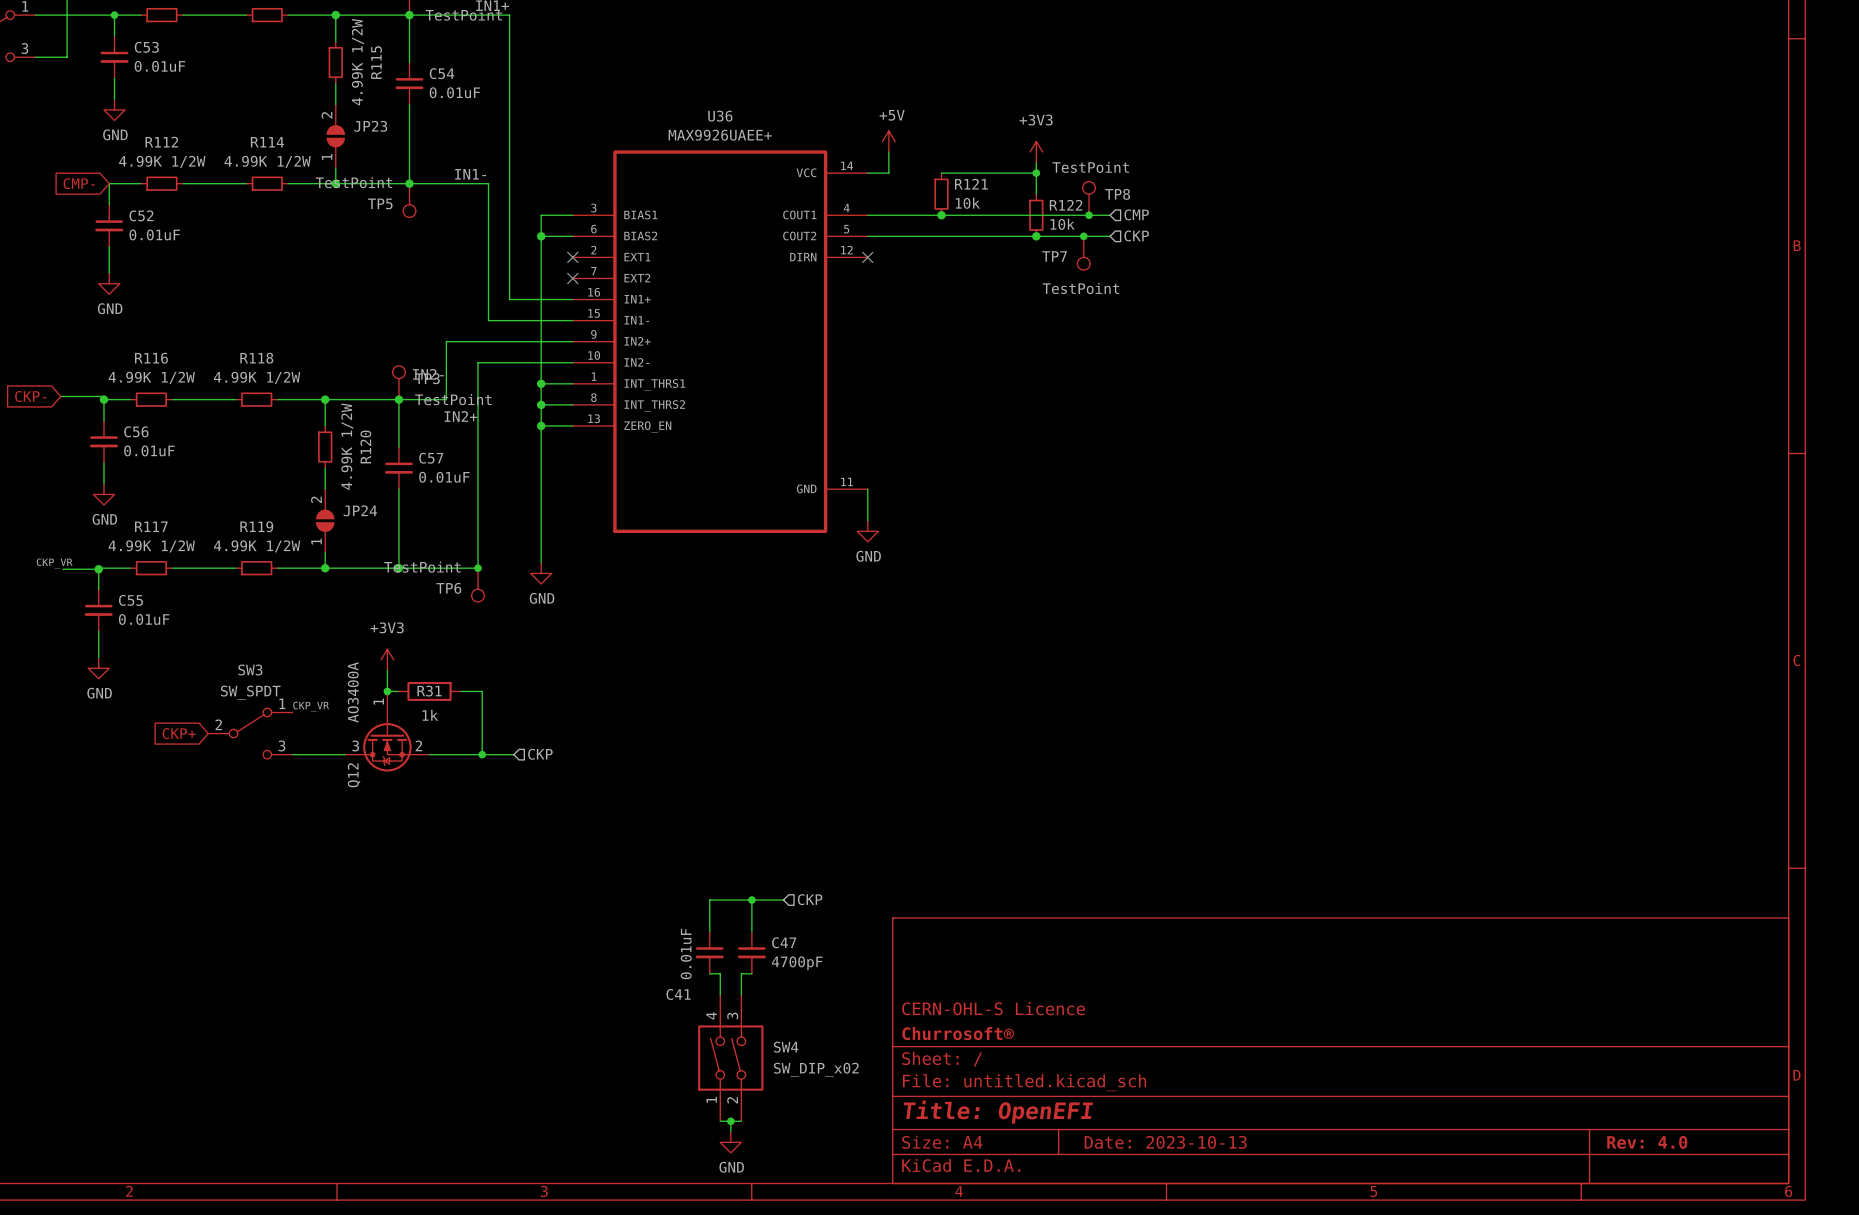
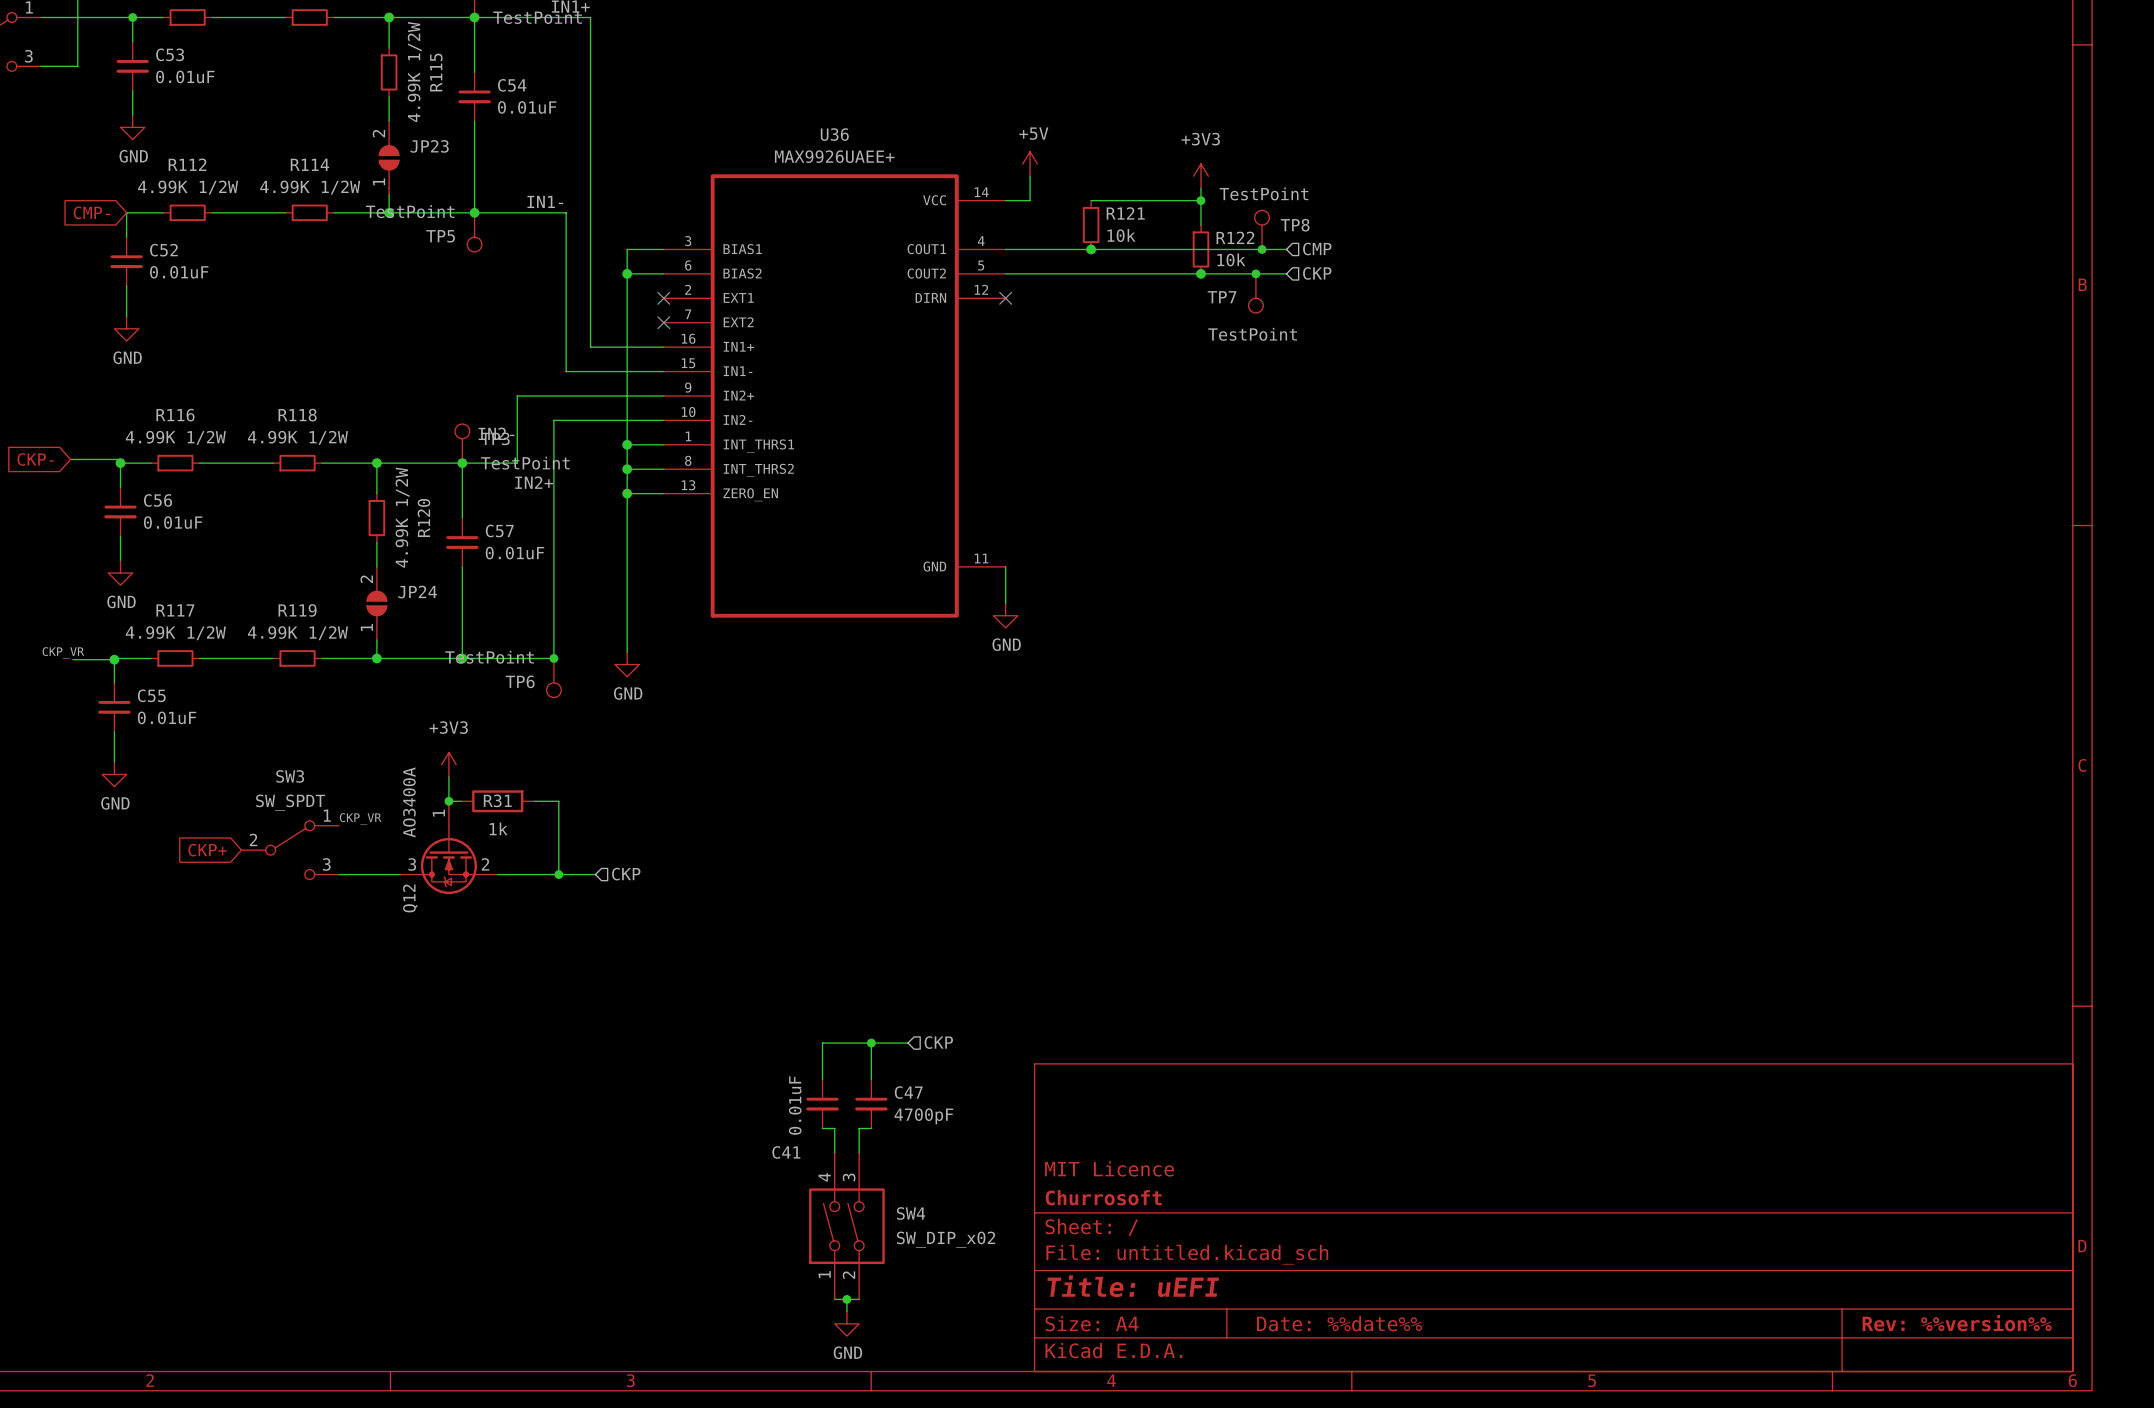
title block: CERN-OHL-S Licence (993, 1008) -> MIT Licence (1109, 1168)
title block: Churrosoft® (958, 1033) -> Churrosoft (1103, 1197)
title block: Title: OpenEFI (998, 1112) -> Title: uEFI (1133, 1286)
title block: Date: 2023-10-13 (1165, 1142) -> Date: %%date%% (1339, 1323)
title block: Rev: 4.0 (1647, 1142) -> Rev: %%version%% (1957, 1323)

